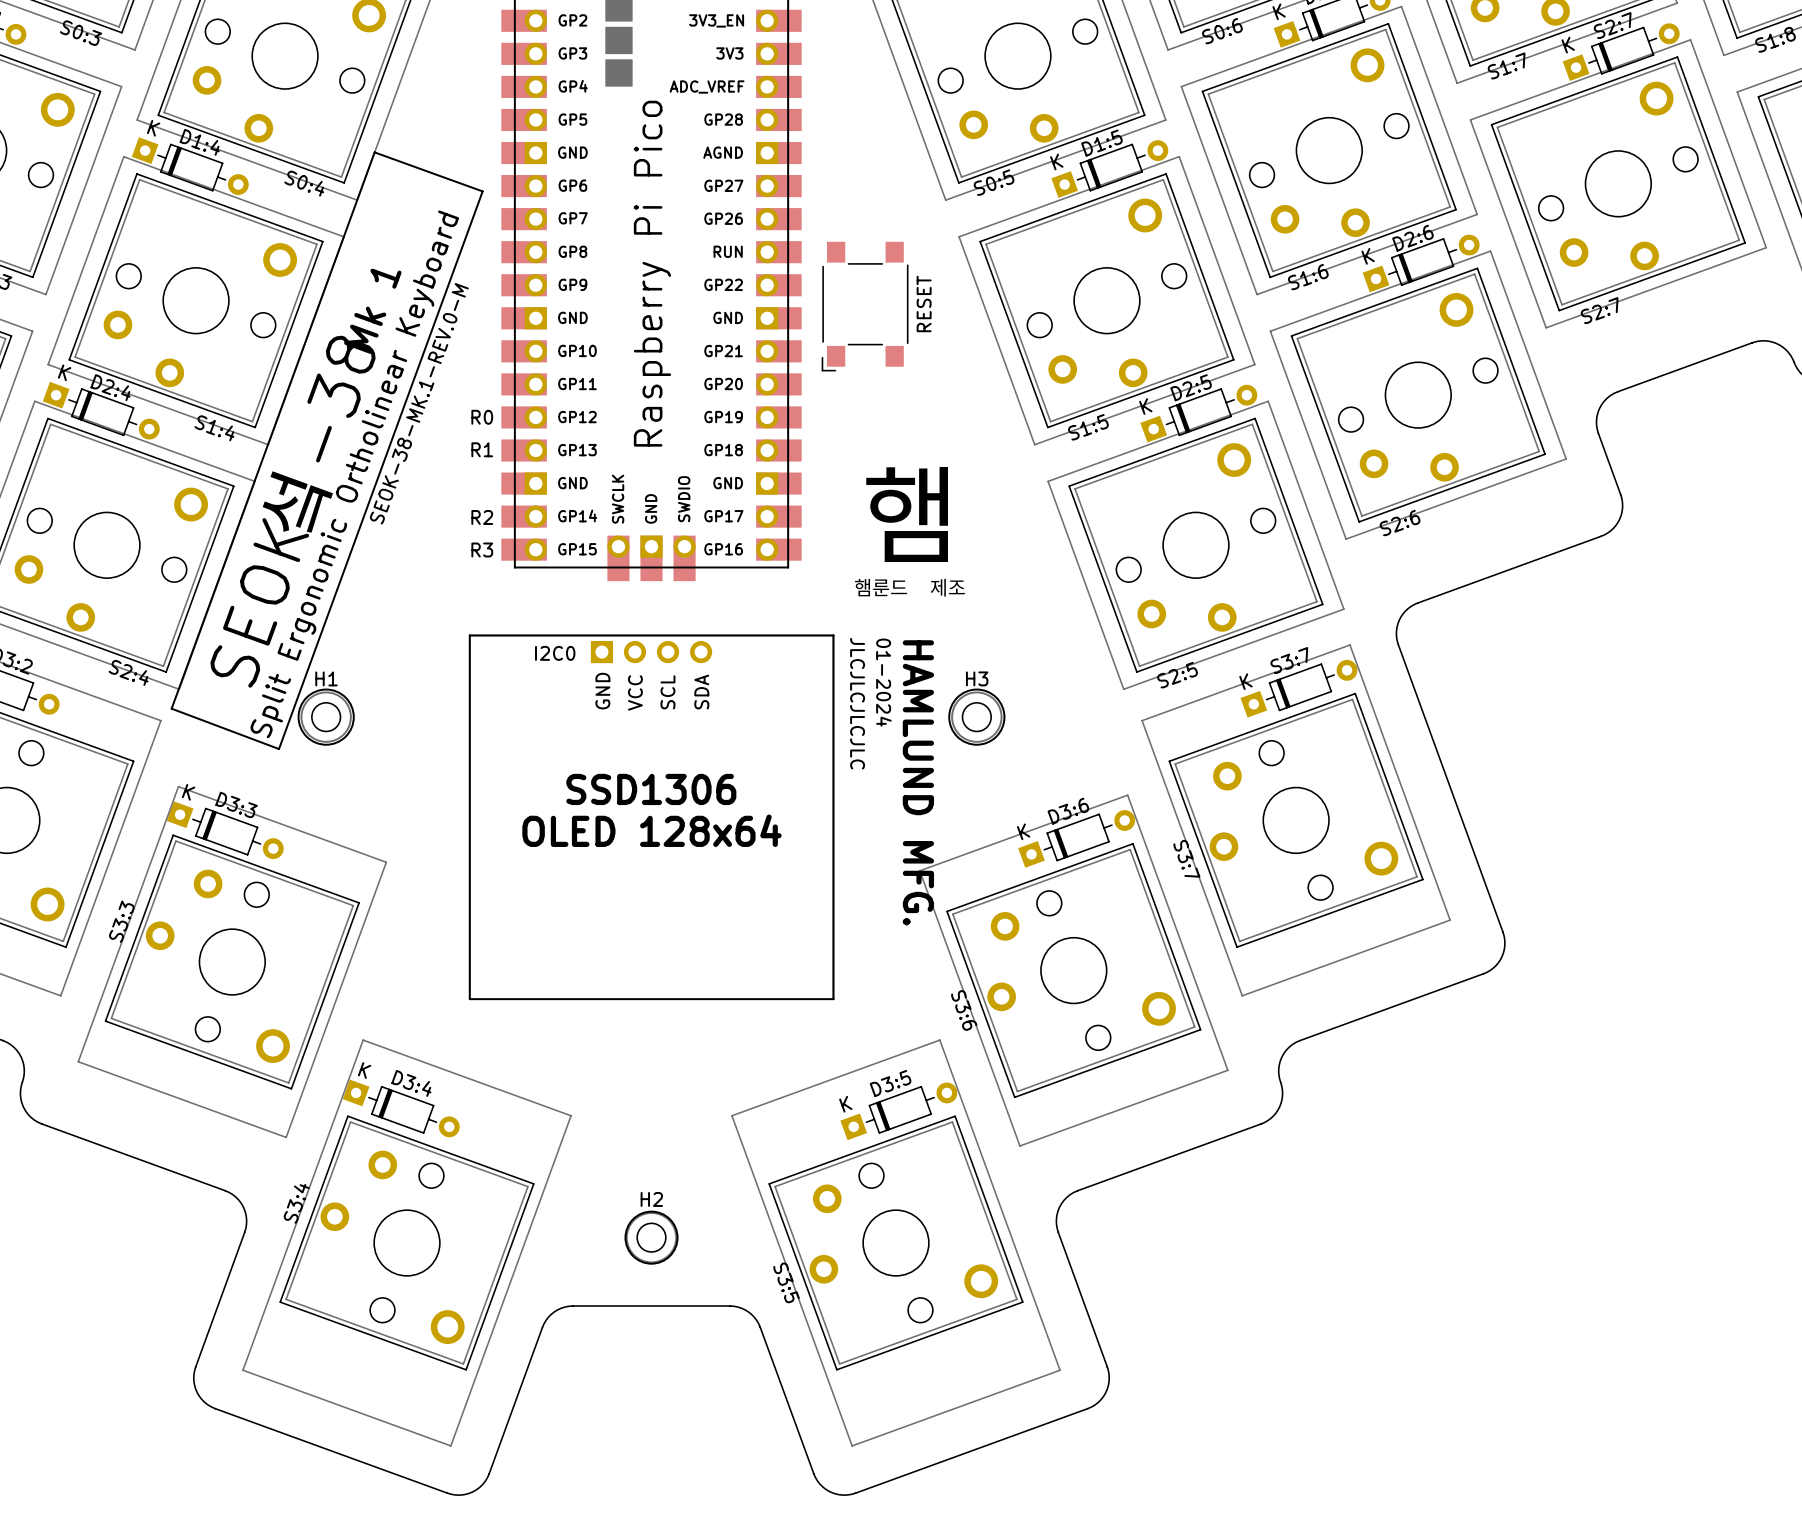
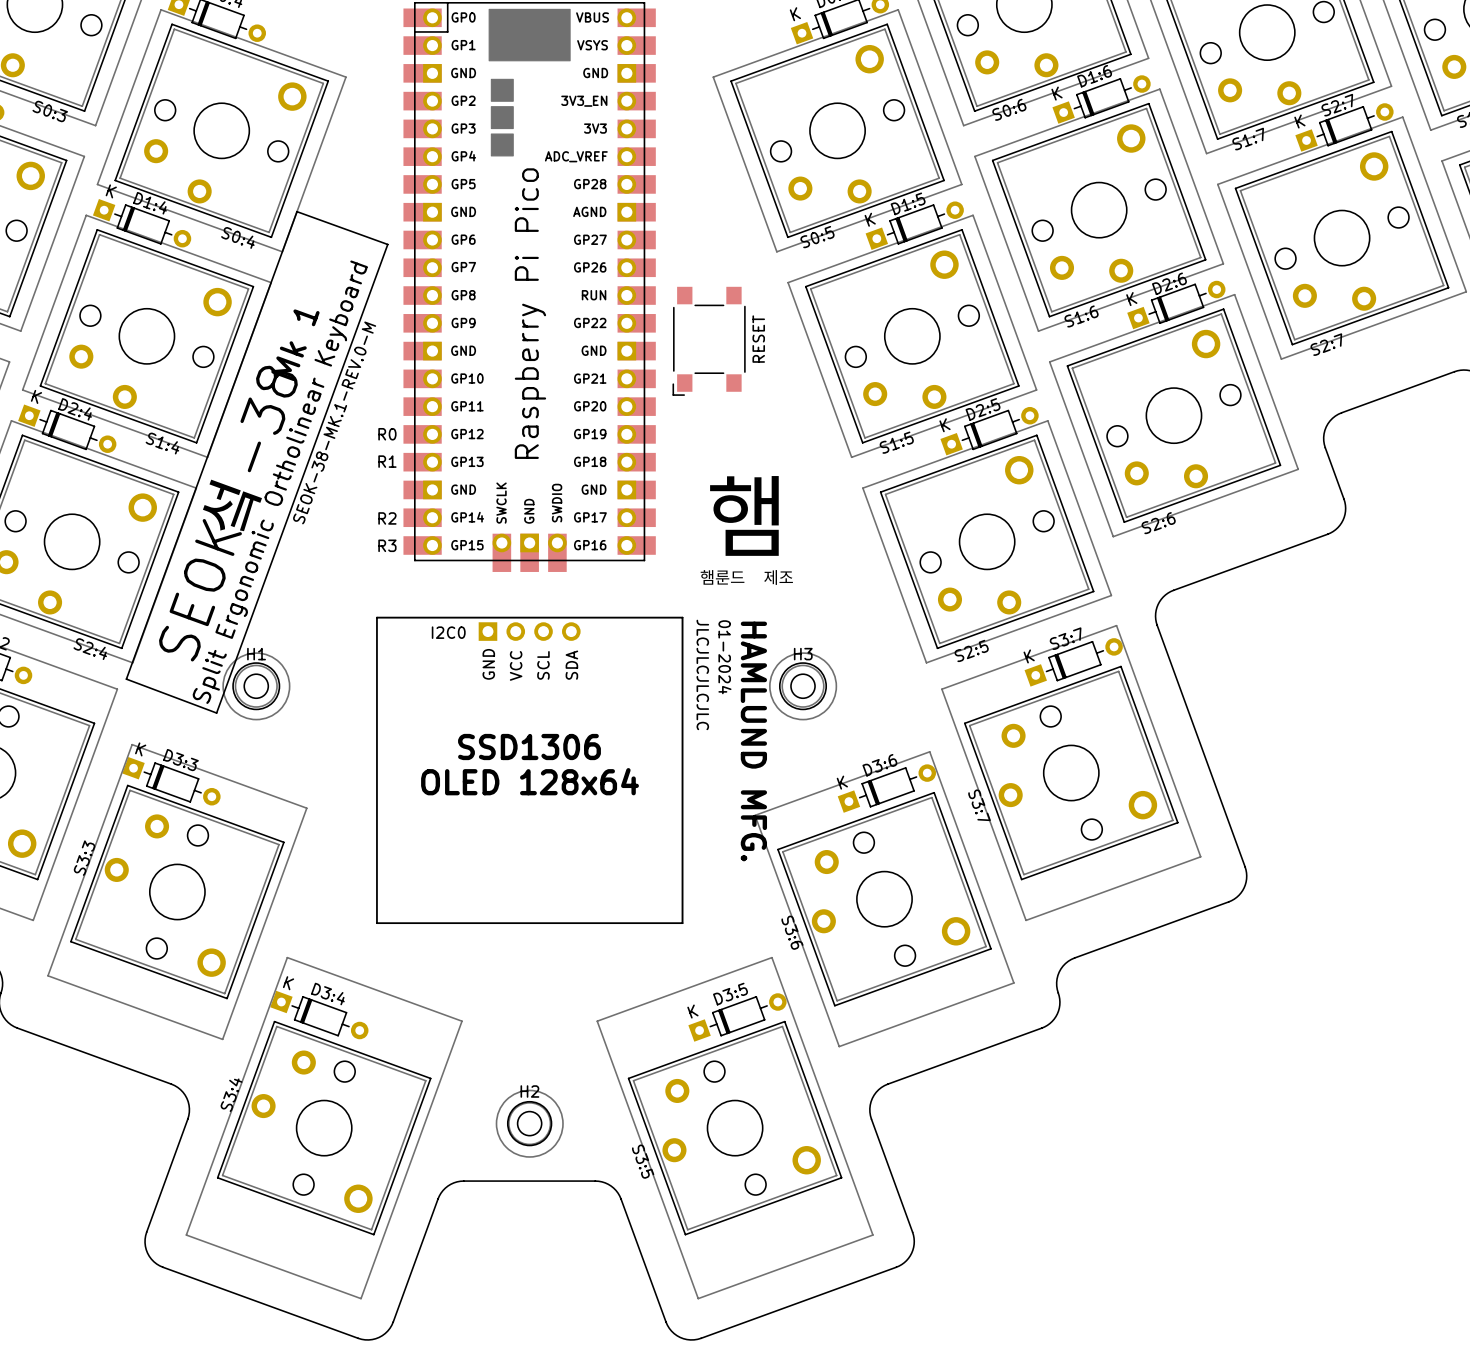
drawing: none -> [222, 652, 291, 721]
drawing: none -> [769, 652, 838, 721]
drawing: none -> [495, 1089, 564, 1158]

